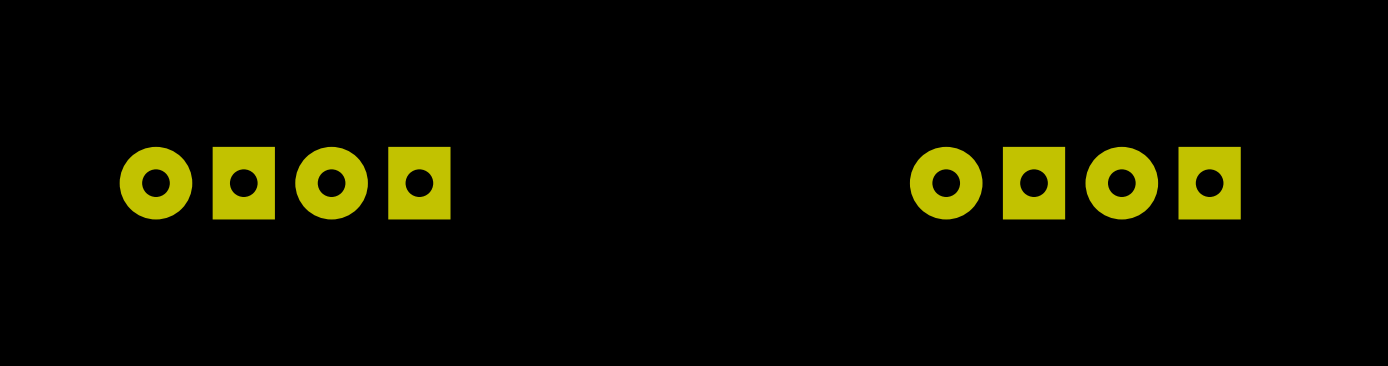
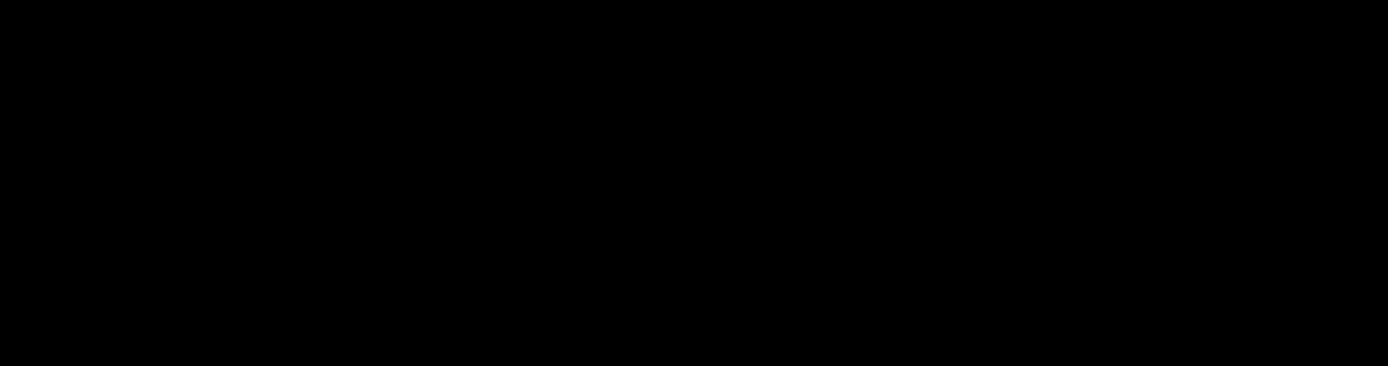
part: (197, 183) -> none
part: (372, 183) -> none
part: (987, 183) -> none
part: (1163, 183) -> none

